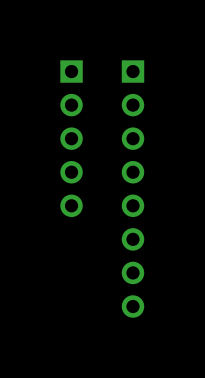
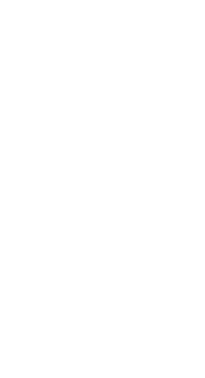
part: (71, 138) -> none
part: (132, 189) -> none

